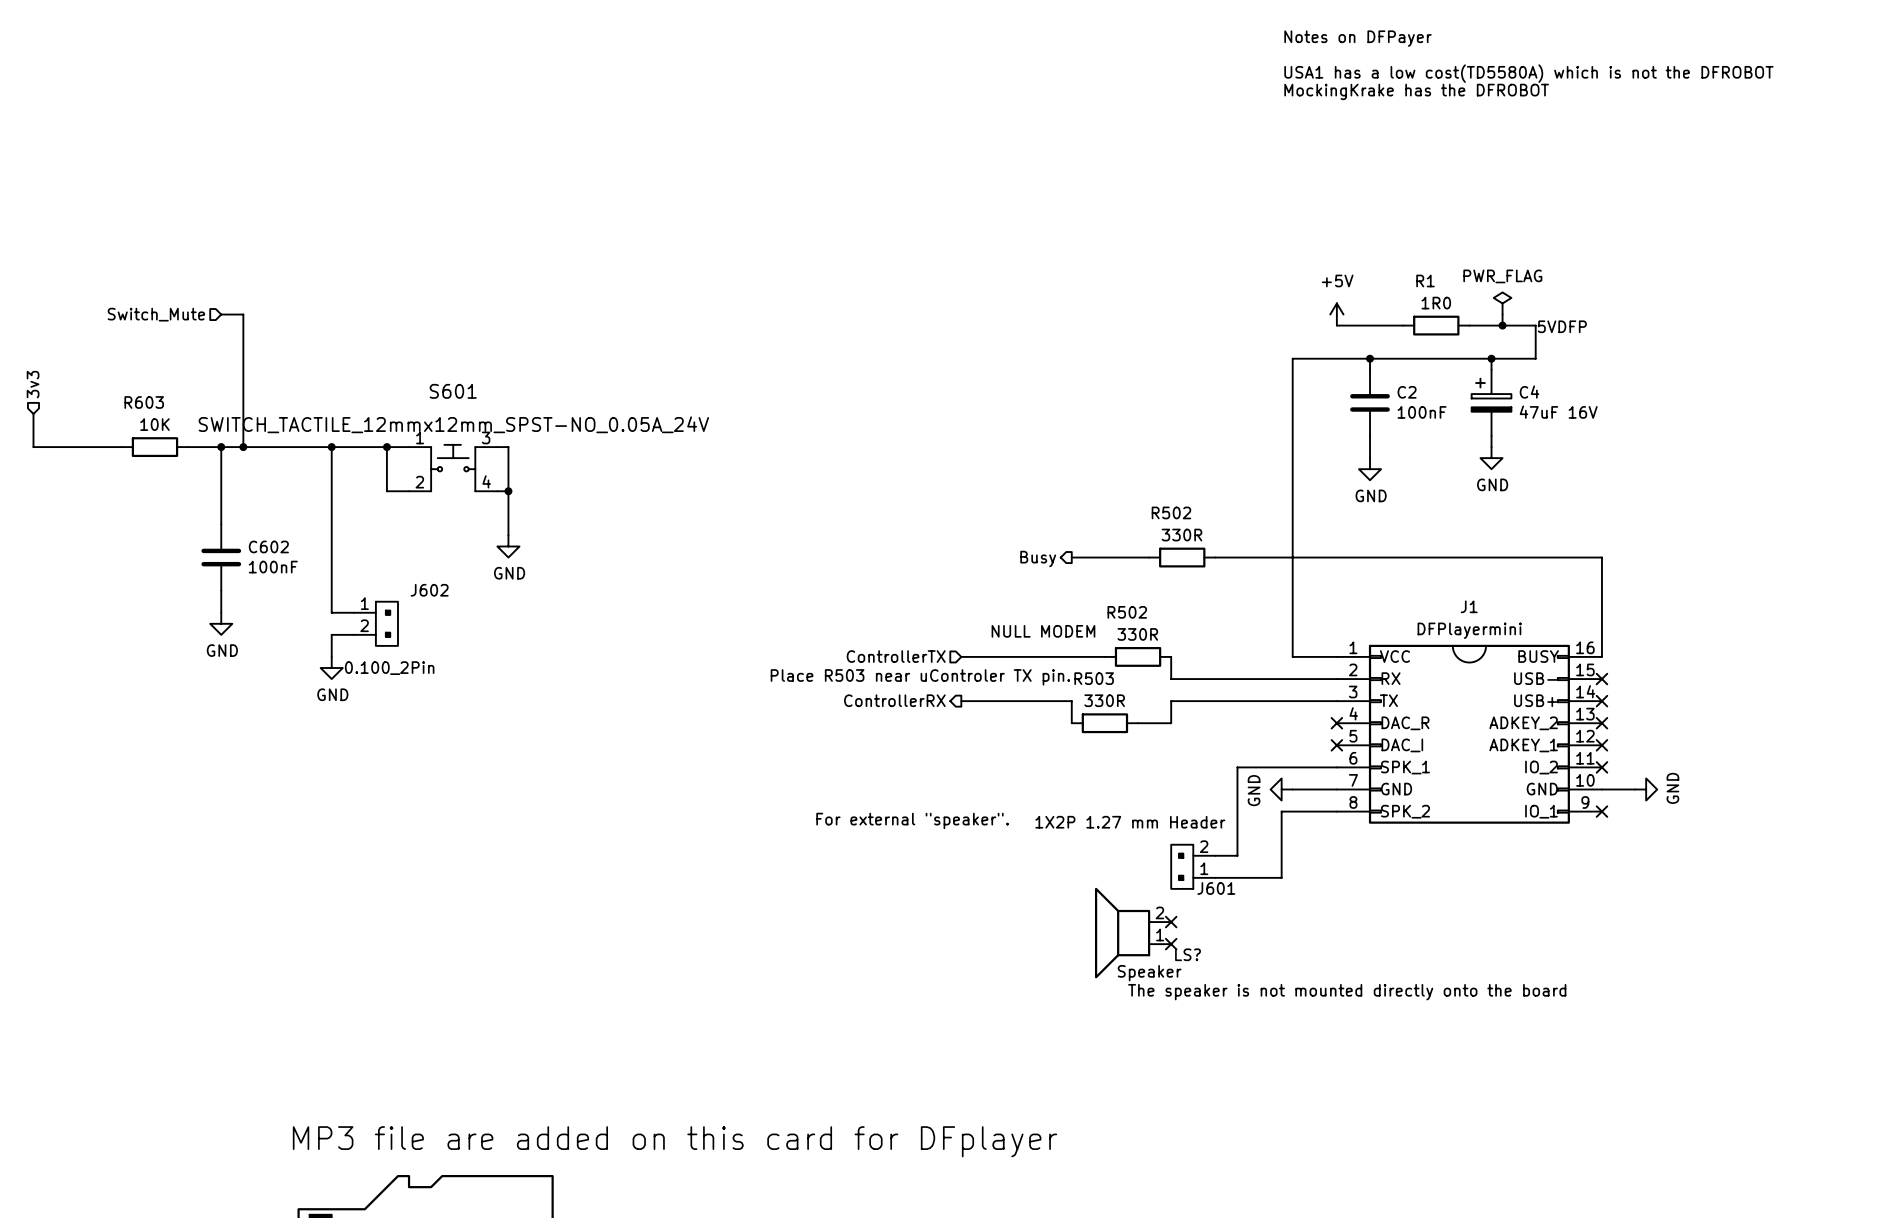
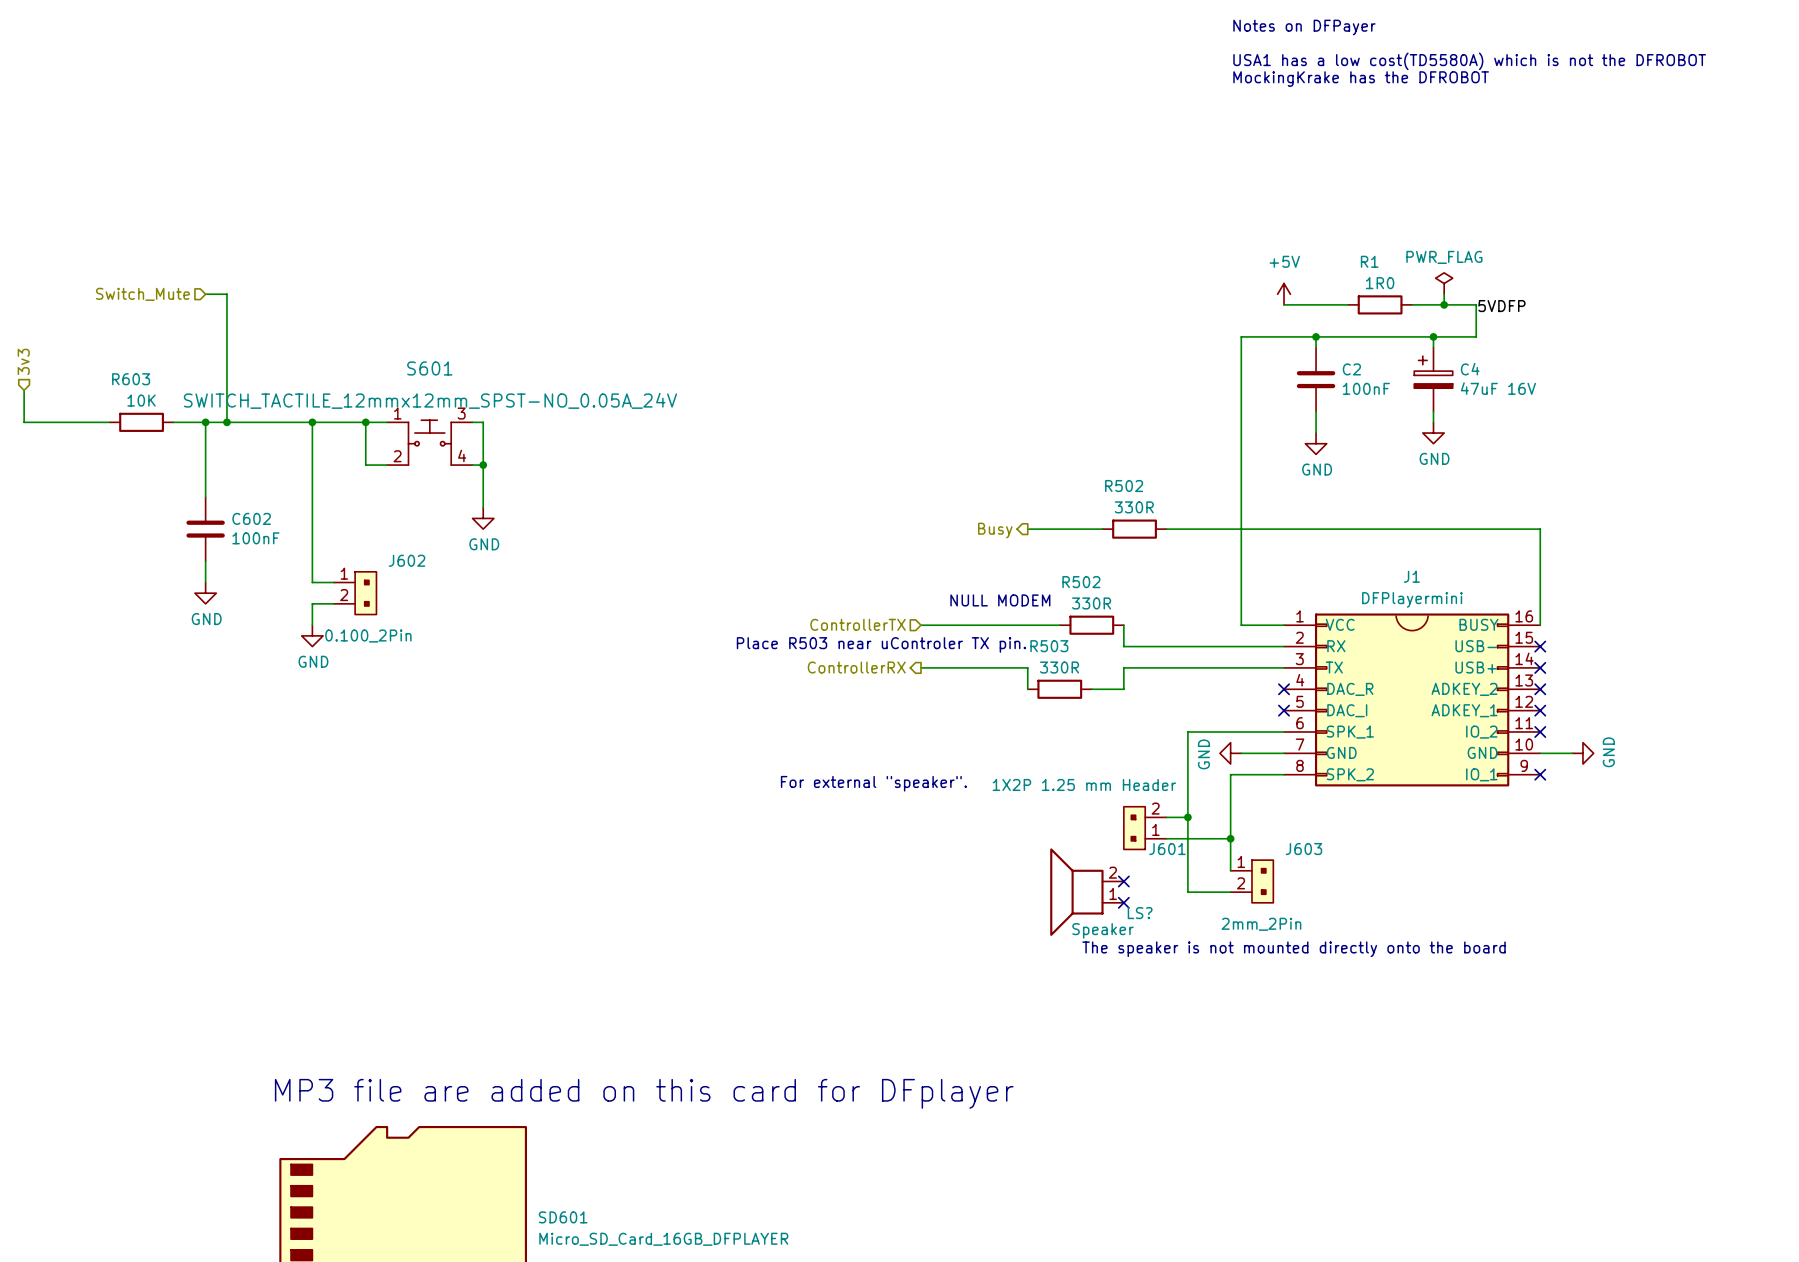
J601 value: 1X2P 1.27 mm Header (1130, 822) -> 1X2P 1.25 mm Header (1084, 784)
wire: none -> (1187, 817) (1187, 892) (1230, 892)
junction: none -> (1187, 817)
wire: none -> (1230, 838) (1230, 870)
junction: none -> (1230, 838)
J603: none -> 2mm_2Pin (1251, 881)

